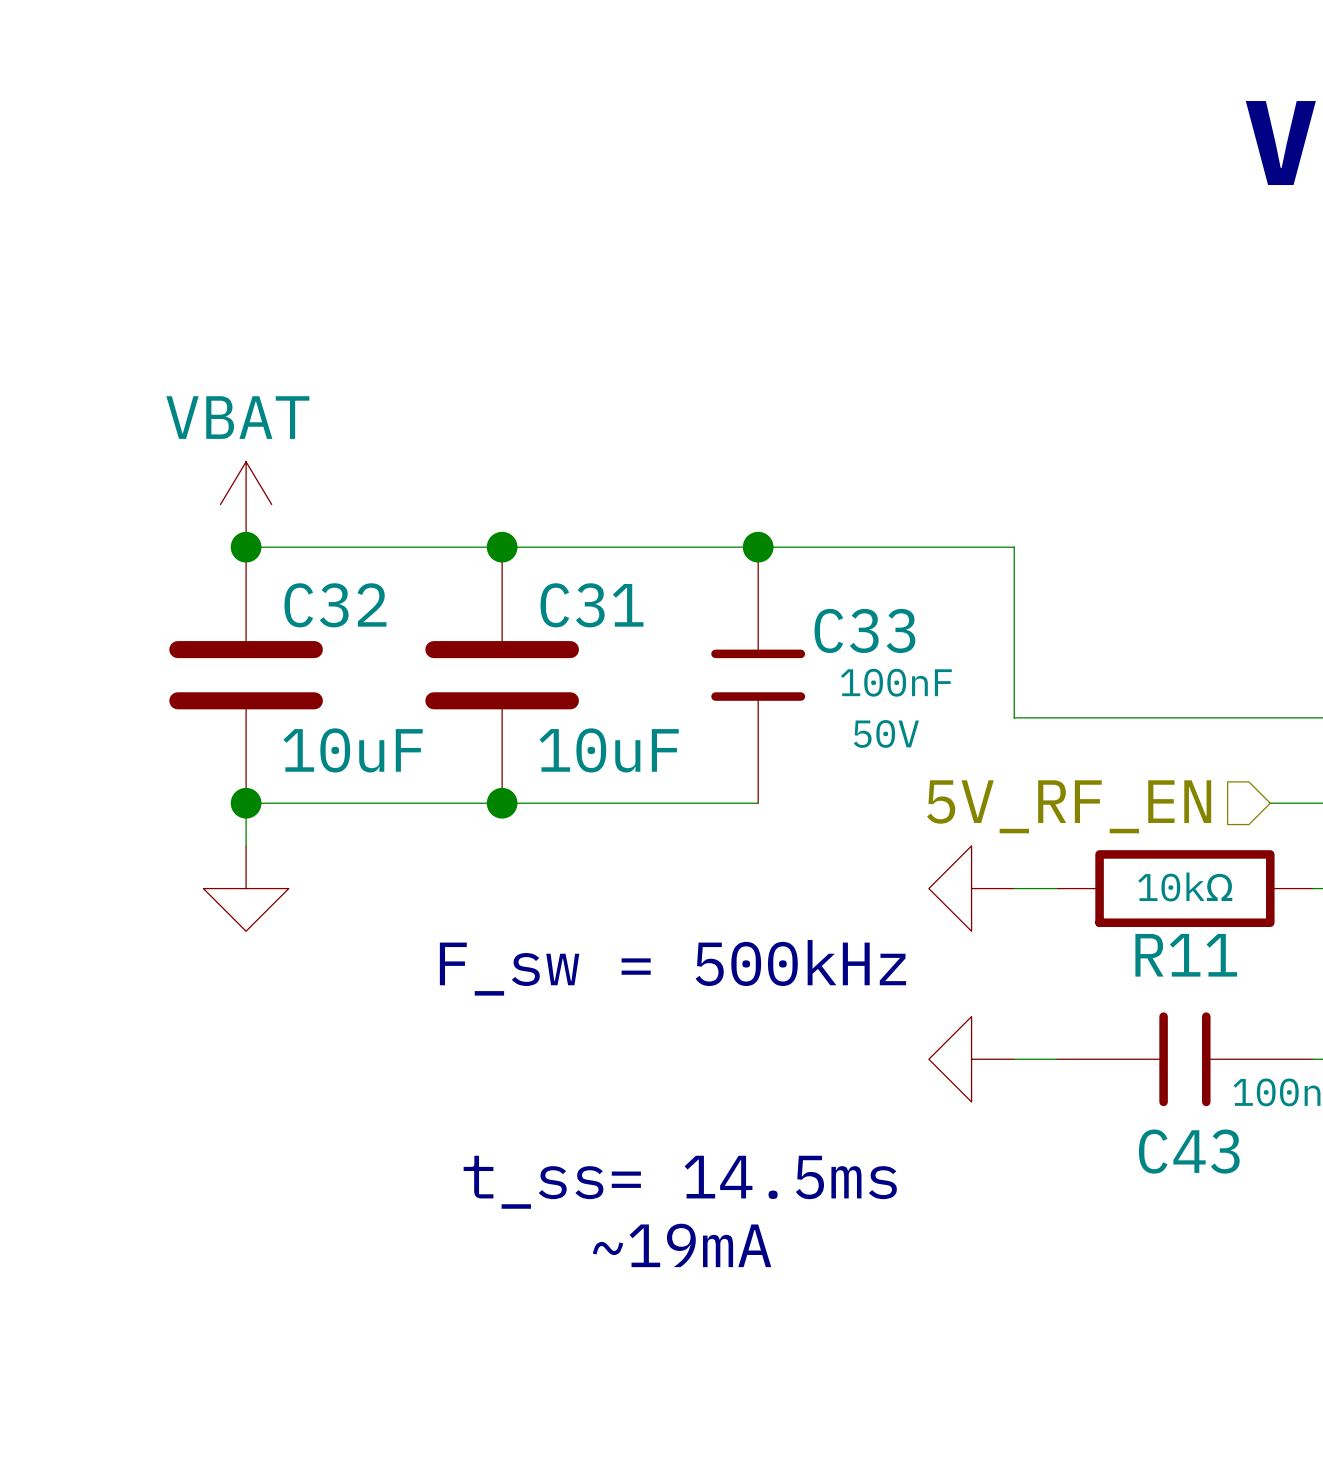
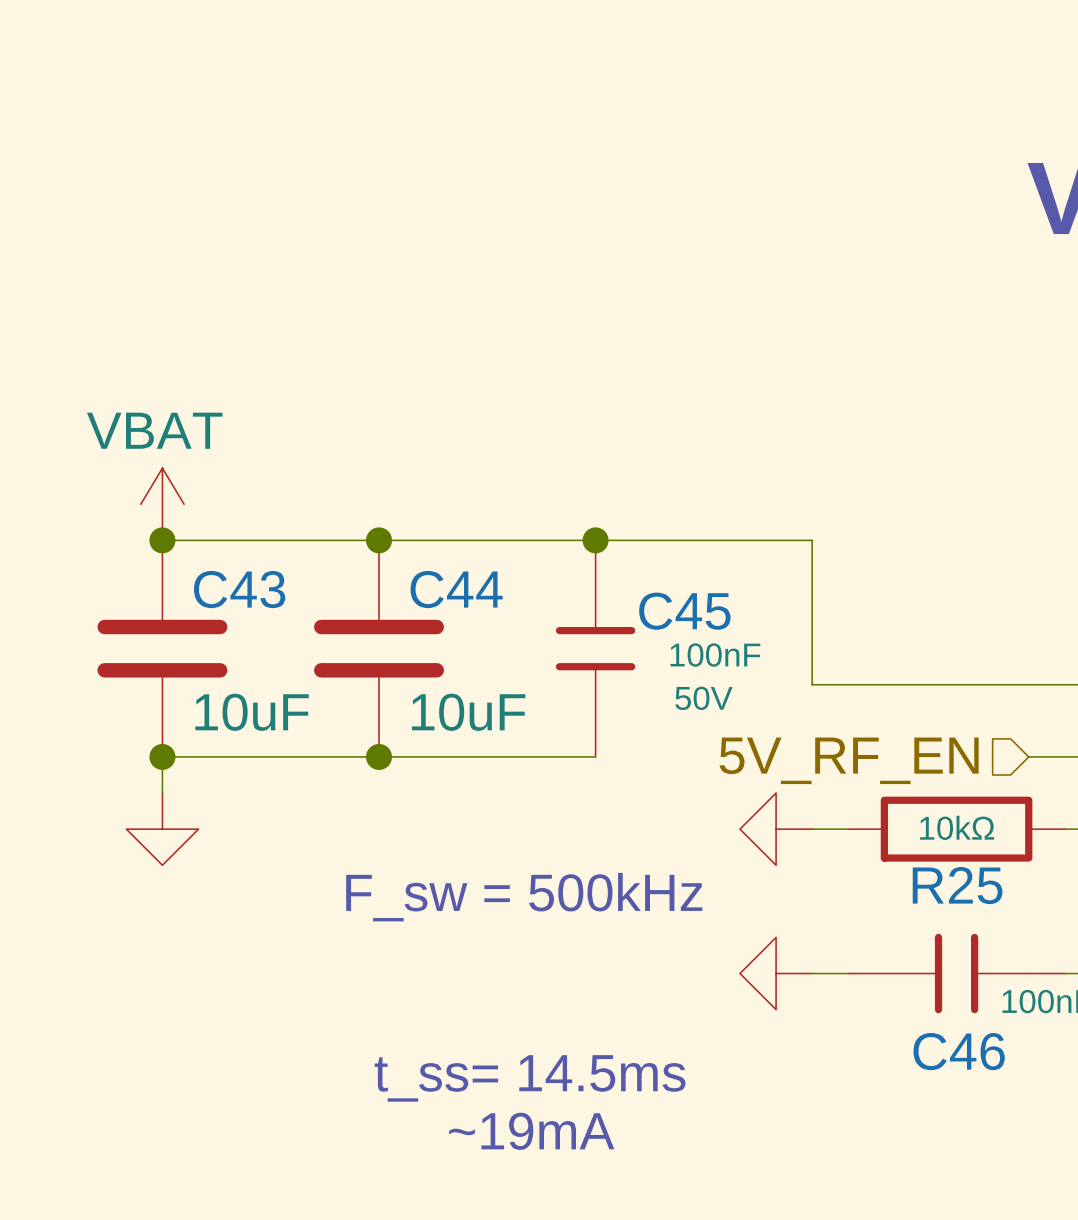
C32 name: C32 (335, 605) -> C43 (239, 589)
C31 name: C31 (592, 605) -> C44 (456, 589)
C33 name: C33 (864, 630) -> C45 (684, 611)
R11 name: R11 (1186, 955) -> R25 (957, 885)
C43 name: C43 (1189, 1151) -> C46 (959, 1051)

